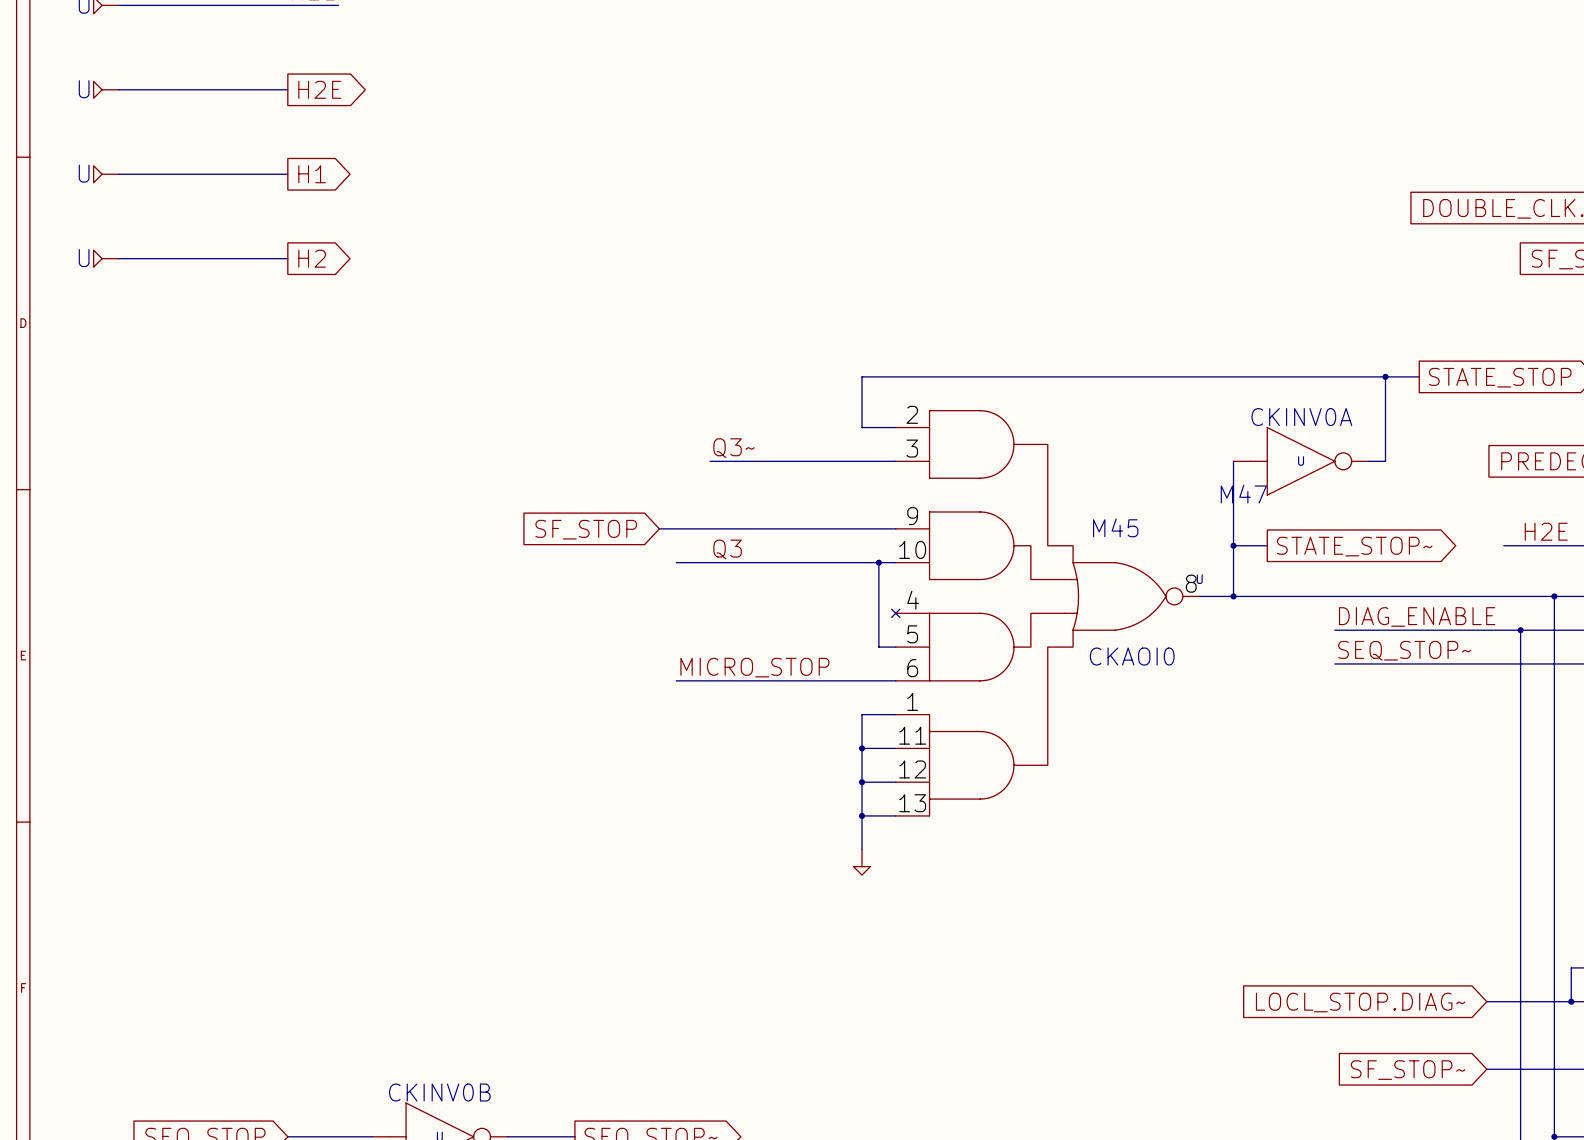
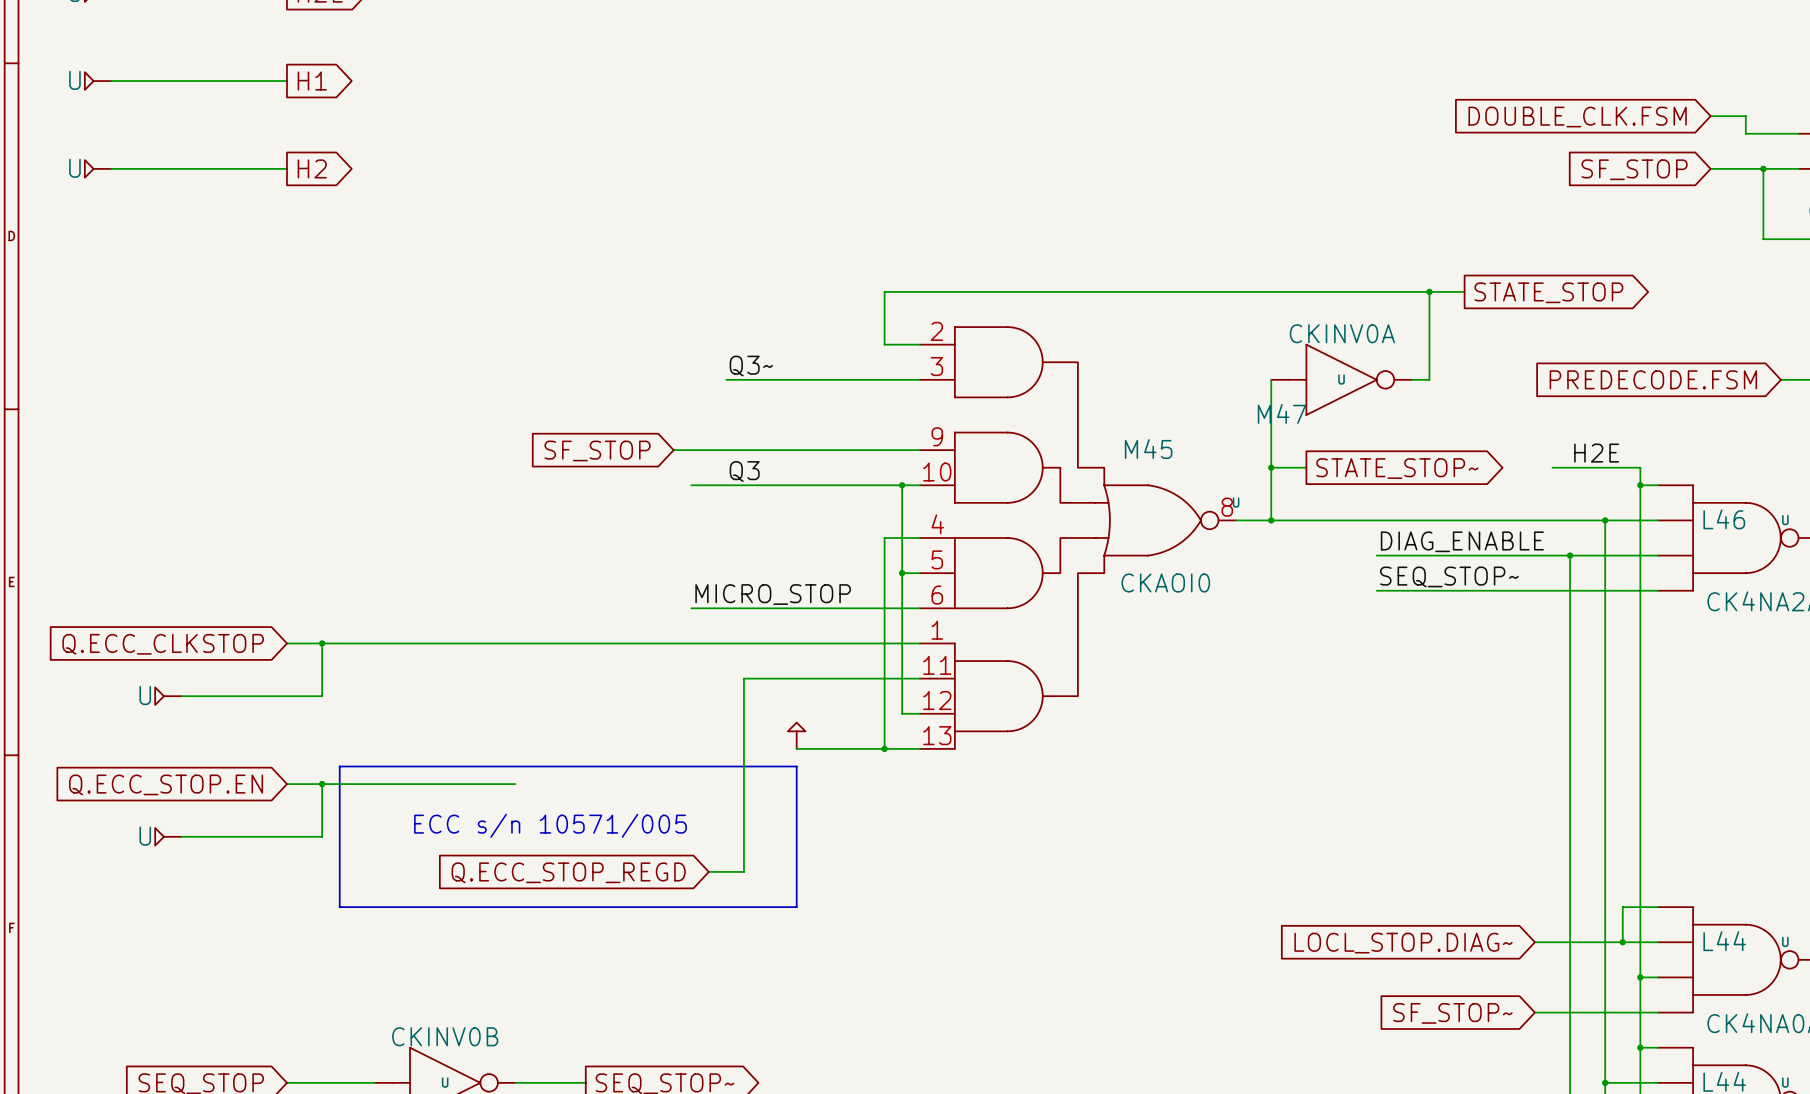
wire: none -> (919, 538) (884, 538) (884, 643) (286, 643)
no-connect mark: (895, 613) -> none
junction: none -> (902, 573)
wire: none -> (322, 643) (322, 696) (181, 696)
junction: none -> (322, 643)
global label: none -> Q.ECC_CLKSTOP (163, 644)
wire: none -> (884, 678) (743, 678) (743, 871) (708, 871)
junction: (862, 748) -> none
U: none -> (168, 696)
wire: (862, 782) (878, 782) -> (902, 573) (902, 713)
junction: (862, 782) -> none
wire: (862, 815) (862, 849) -> (884, 748) (796, 748)
line: none -> (339, 766) (796, 766) (796, 907) (339, 907) (339, 766)
wire: none -> (286, 784) (515, 784)
wire: none -> (322, 784) (322, 836) (181, 836)
junction: none -> (322, 784)
global label: none -> Q.ECC_STOP.EN (166, 784)
power symbol position: (862, 862) -> (796, 735)
power symbol rotation: 0° (862, 870) -> 180° (796, 726)
text: none -> ECC s/n 10571/005 (550, 825)
U: none -> (168, 836)
global label: none -> Q.ECC_STOP_REGD (568, 872)

